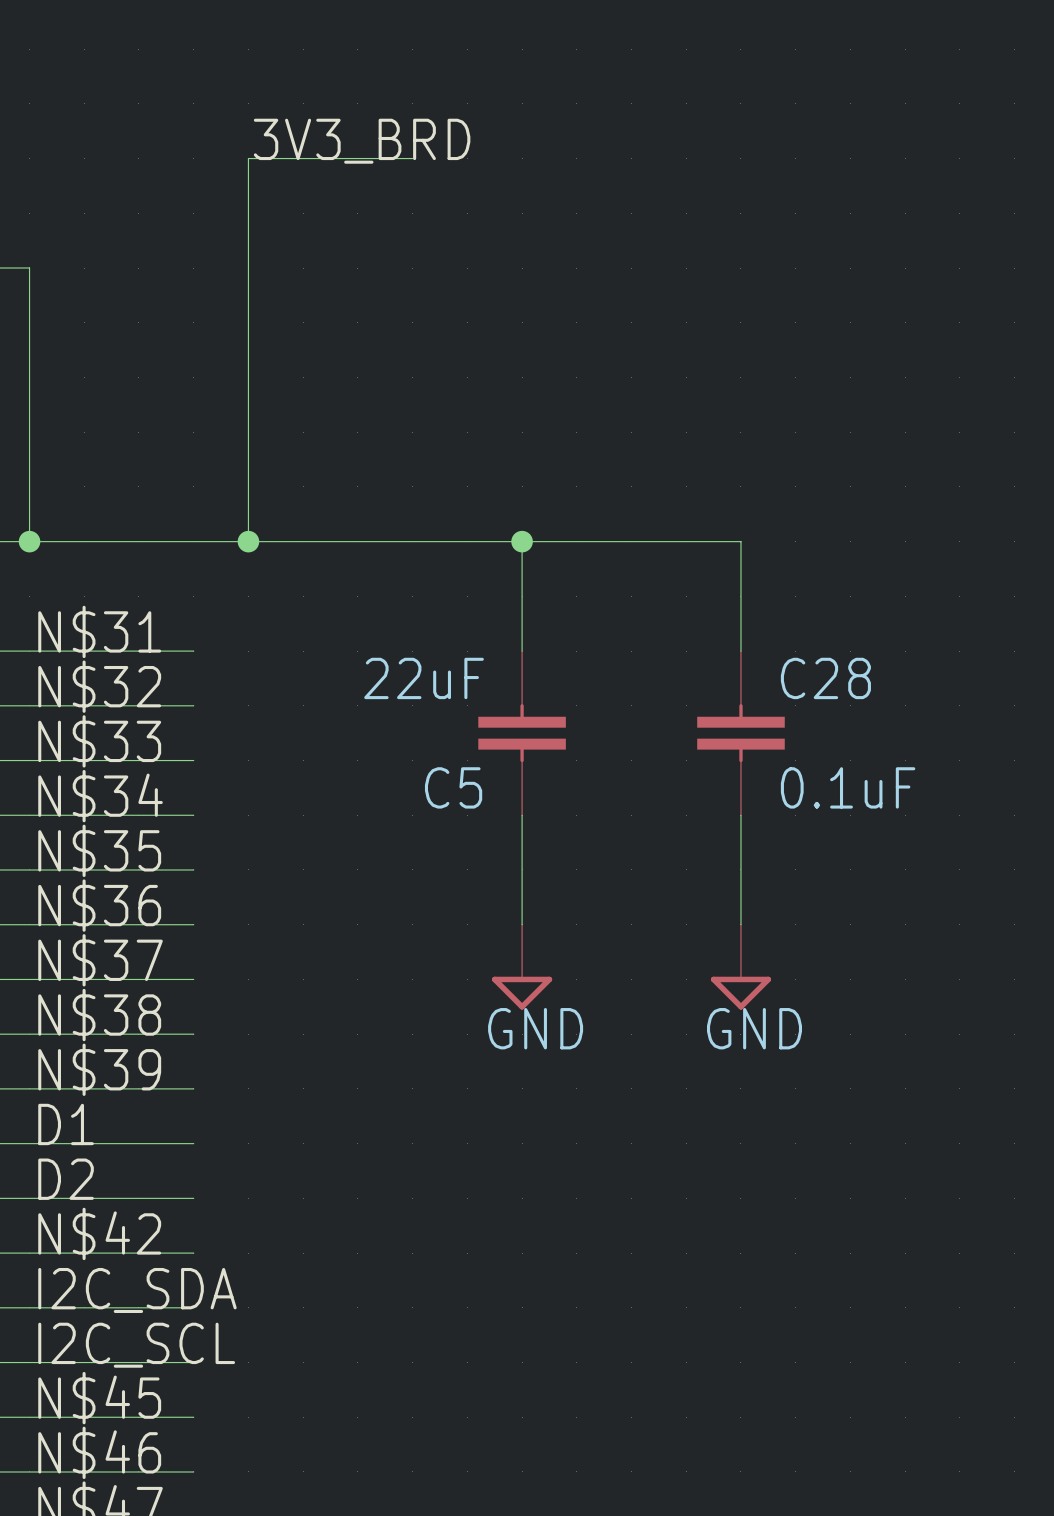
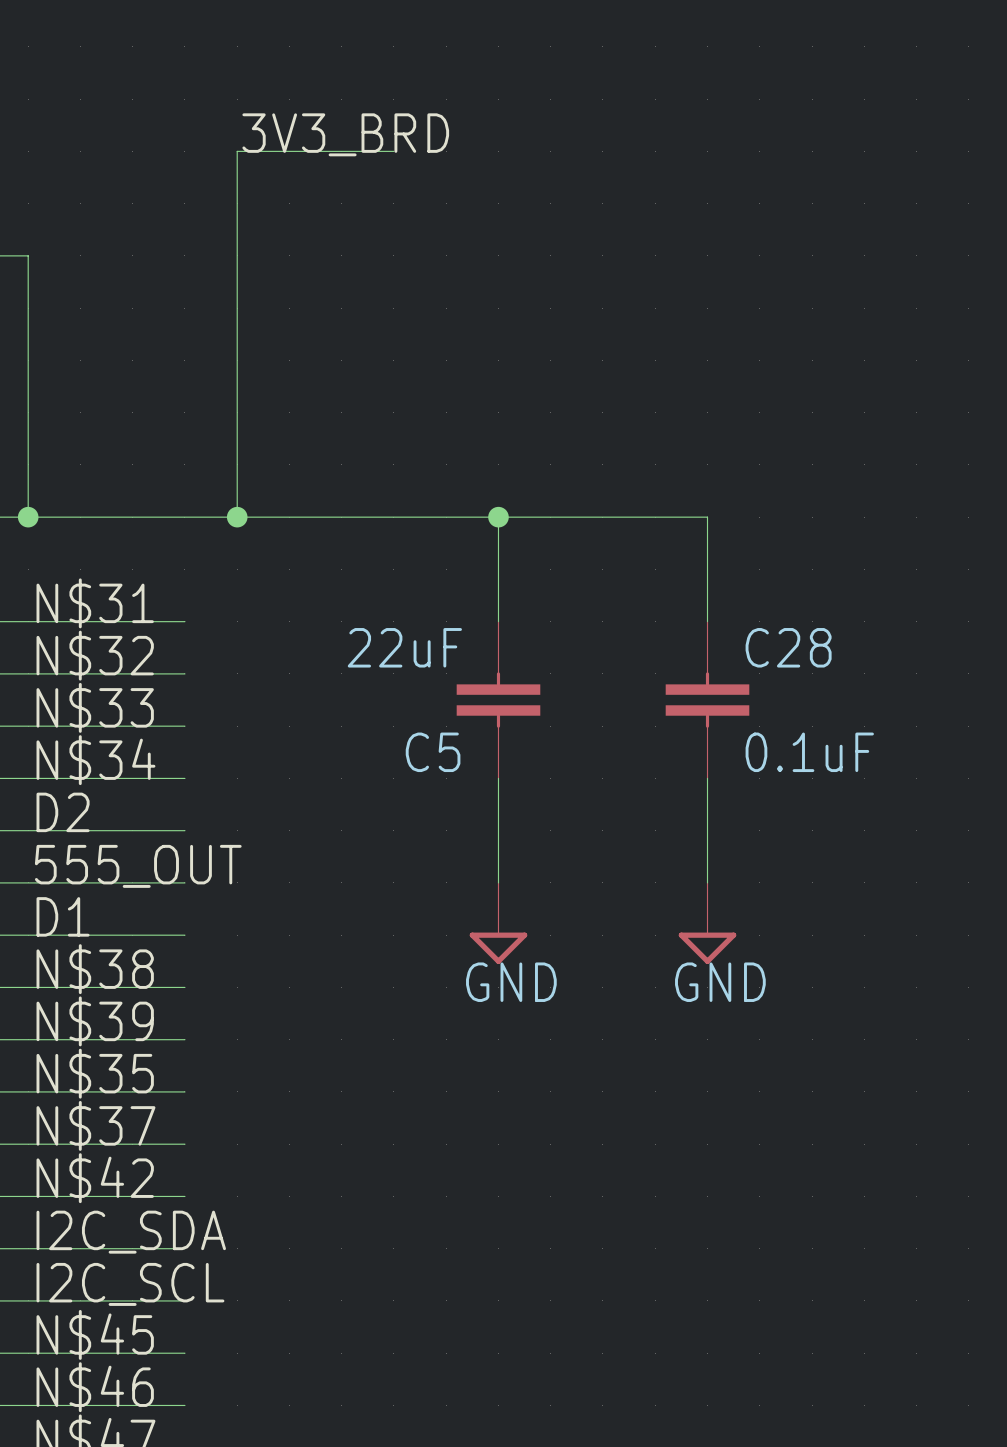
label: N$35 (99, 850) -> D2 (63, 812)
label: N$36 (99, 905) -> 555_OUT (138, 866)
label: N$37 (100, 960) -> D1 (63, 916)
label: D1 (66, 1124) -> N$35 (95, 1073)
label: D2 (66, 1179) -> N$37 (95, 1125)

